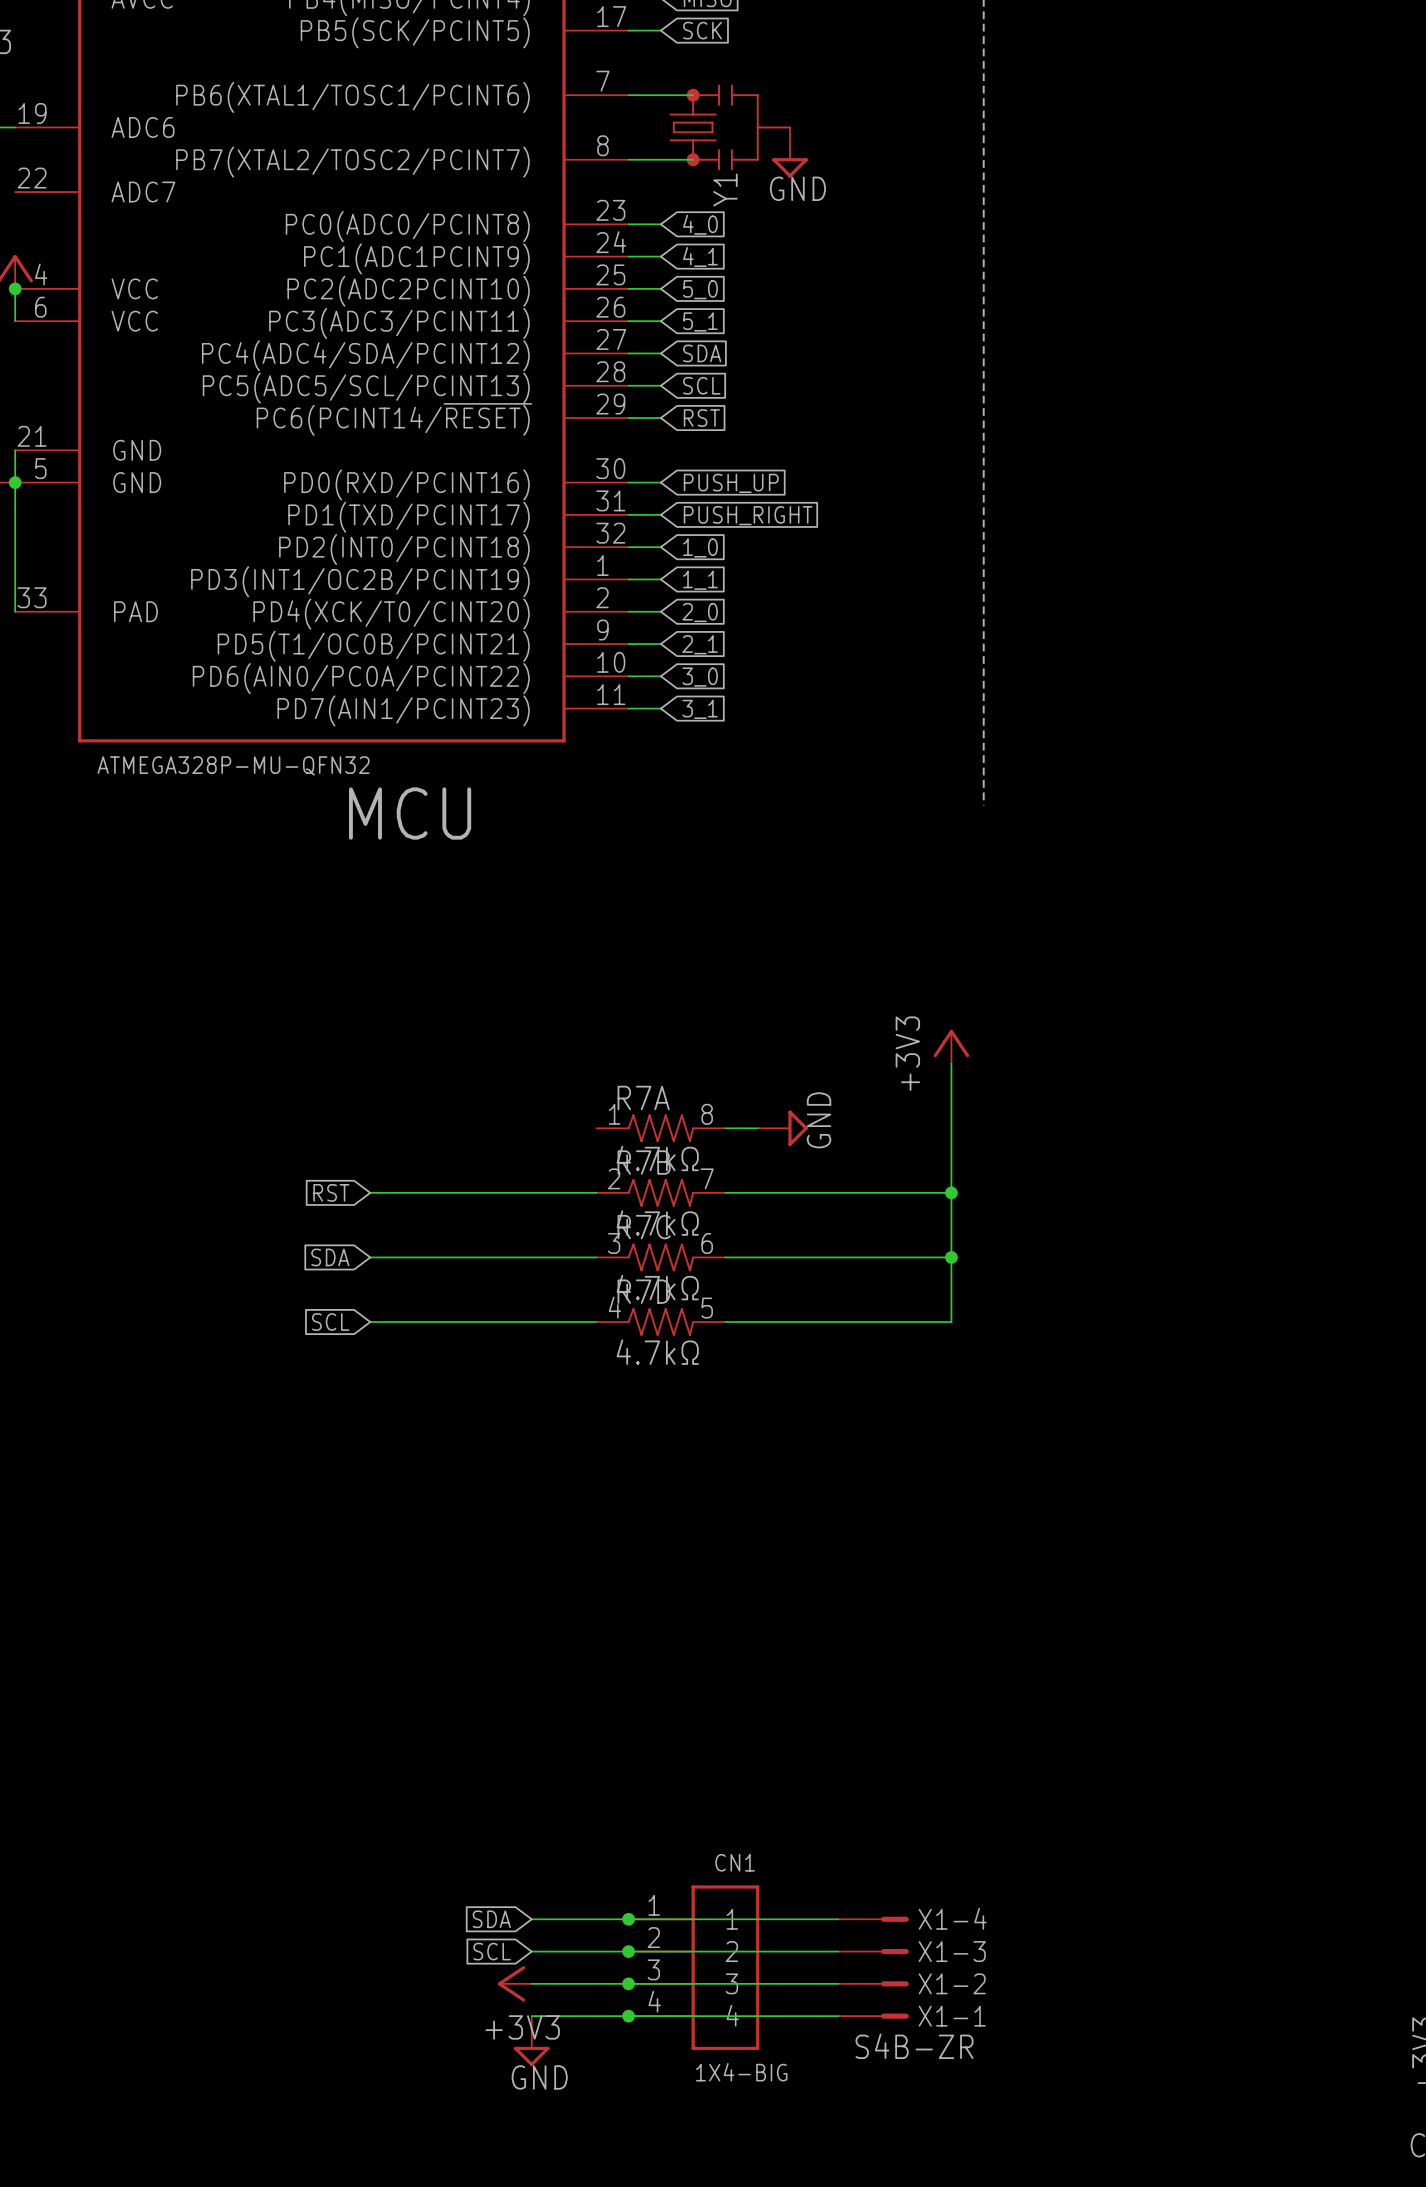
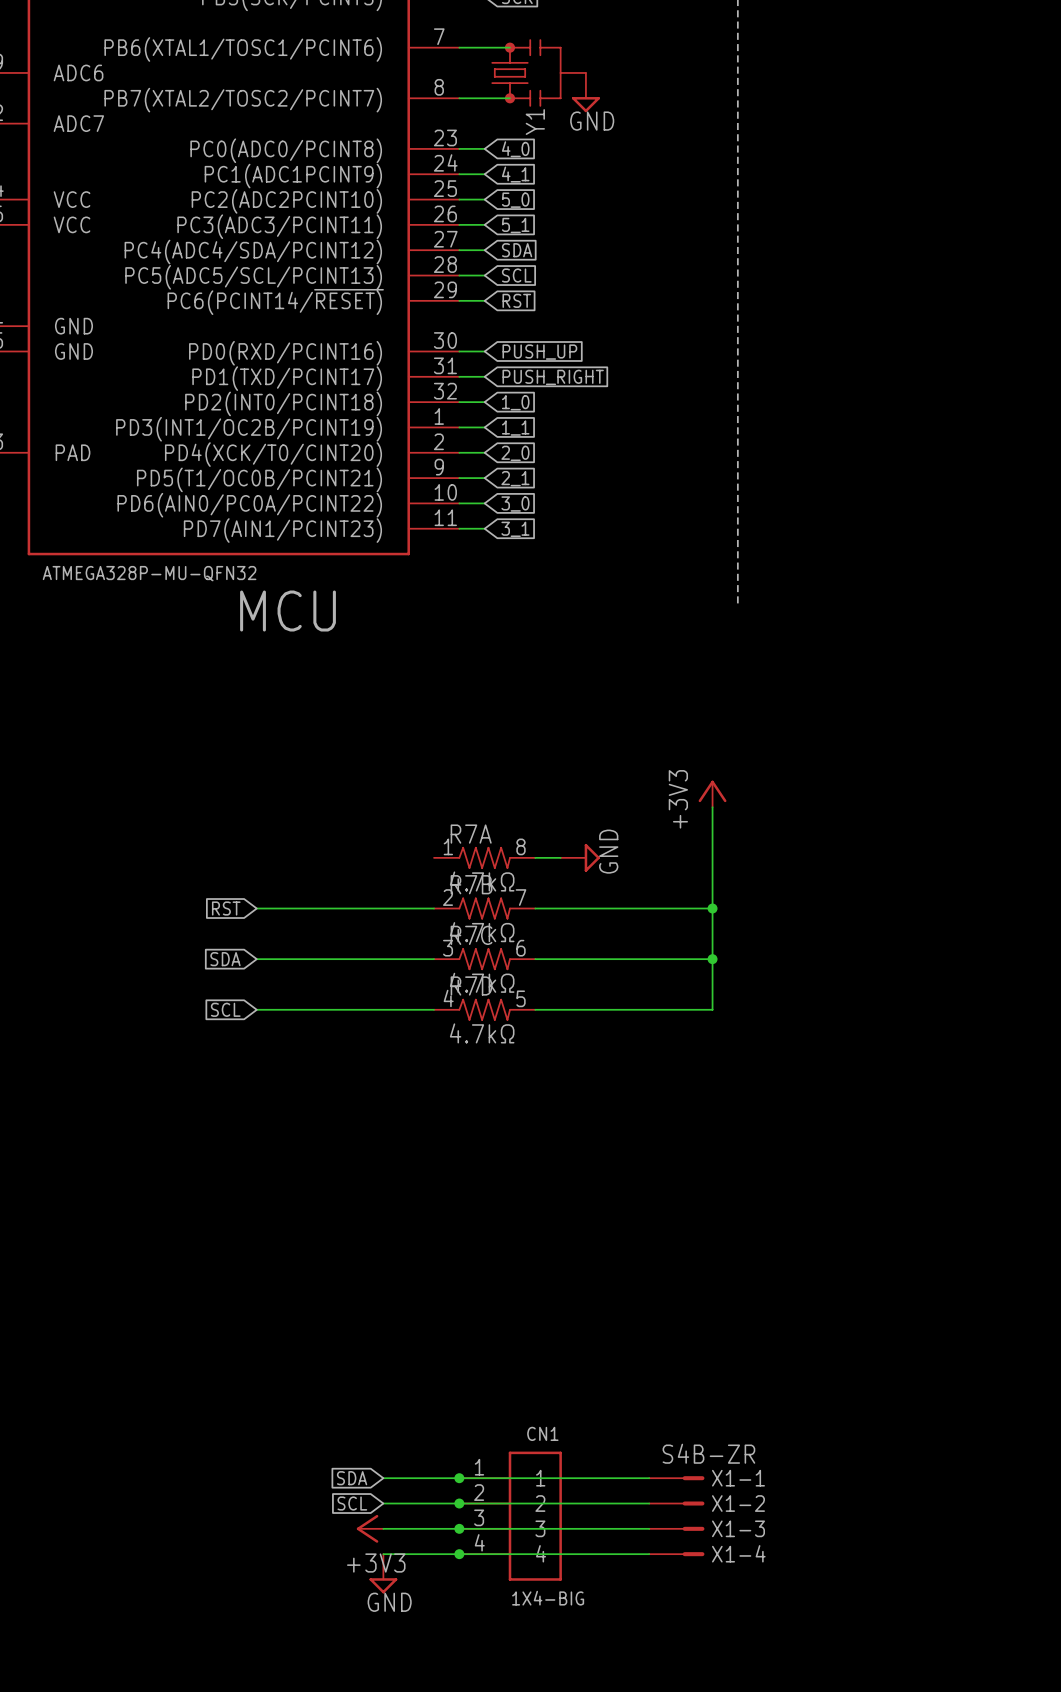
X1-4 position: (873, 1919) -> (676, 1554)
X1-3 position: (873, 1951) -> (676, 1528)
X1-2 position: (873, 1983) -> (676, 1503)
X1-1 position: (873, 2016) -> (676, 1478)
X1-1 value position: S4B-ZR (914, 2046) -> S4B-ZR (708, 1453)

